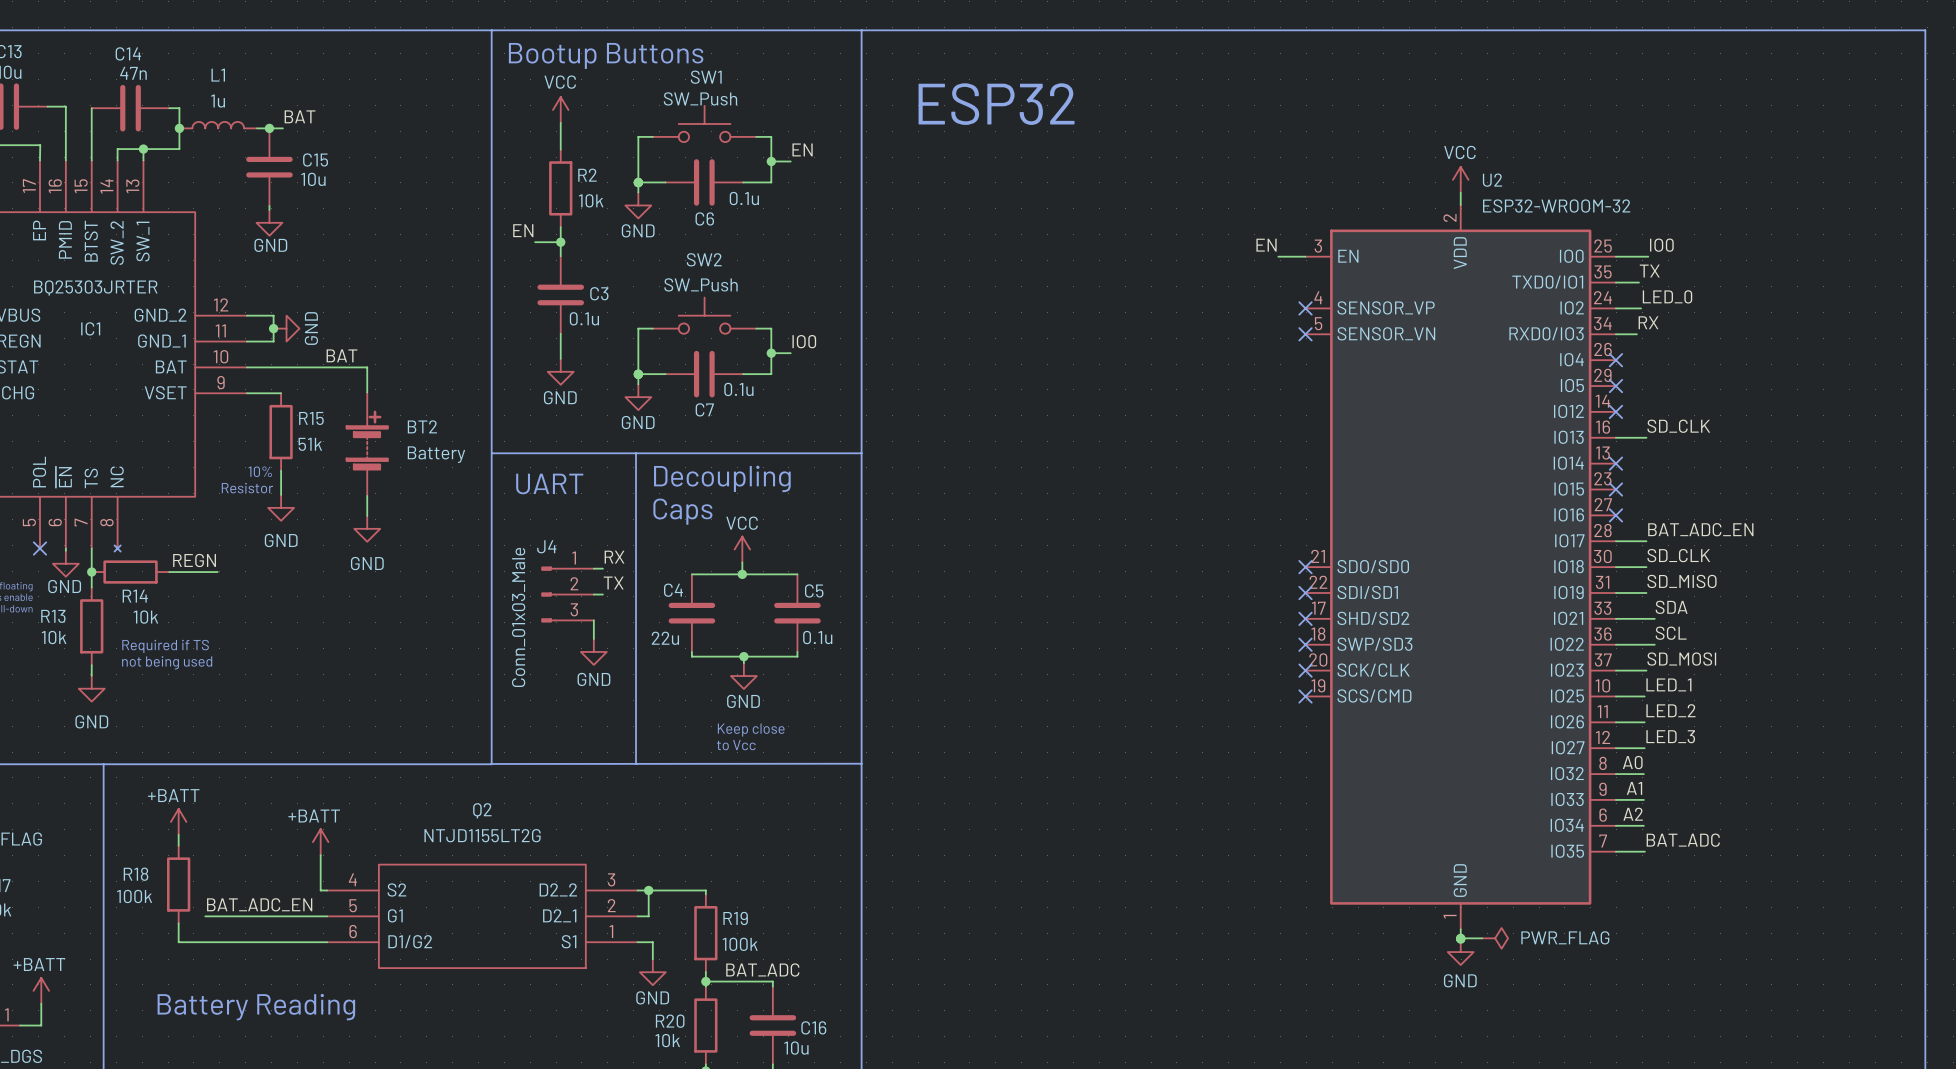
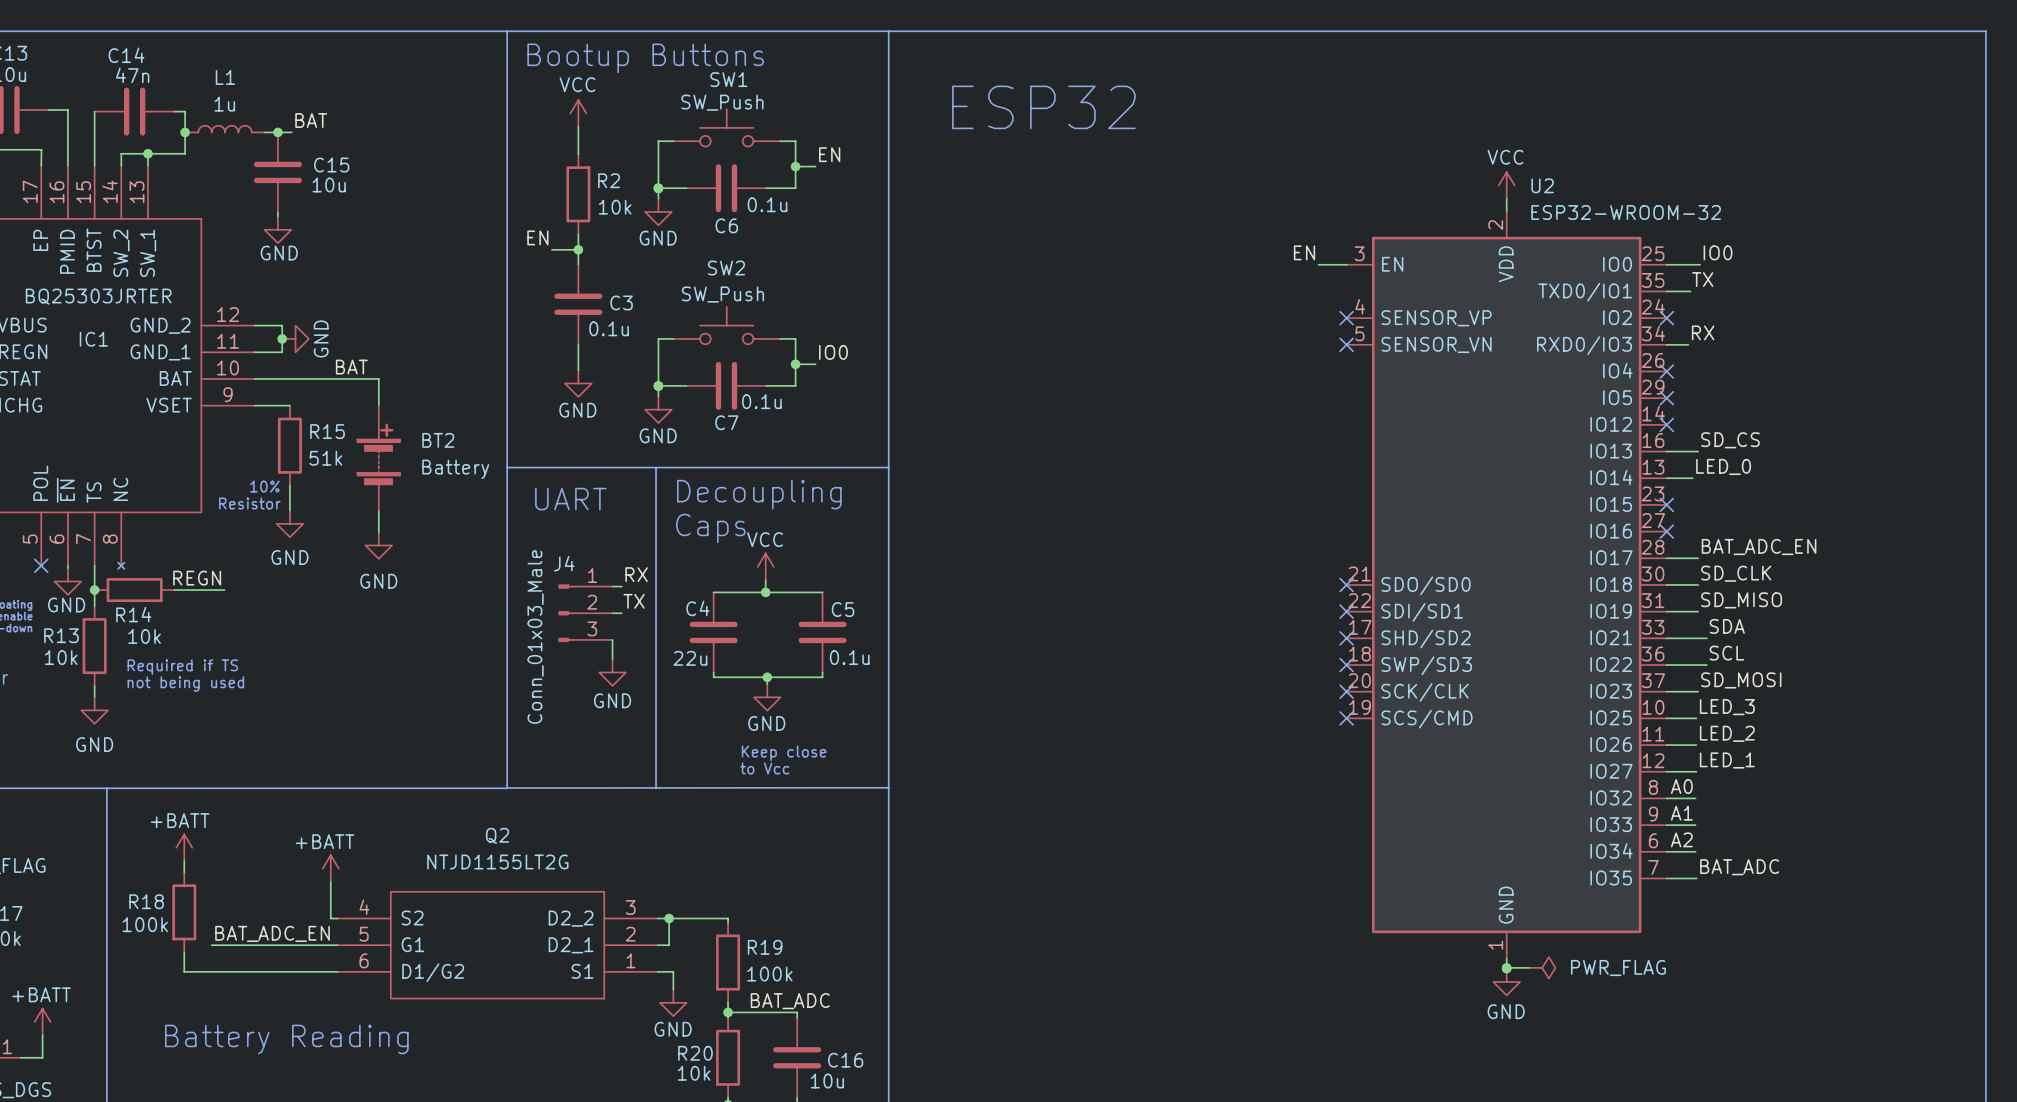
label position: LED_0 (1667, 296) -> LED_0 (1723, 466)
wire: (1615, 308) (1641, 308) -> (1666, 478) (1692, 478)
no-connect mark: none -> (1666, 318)
label: SD_CLK (1678, 426) -> SD_CS (1730, 440)
no-connect mark: (1615, 463) -> none
label: LED_1 (1668, 684) -> LED_3 (1727, 707)
label: LED_3 (1670, 736) -> LED_1 (1727, 760)

